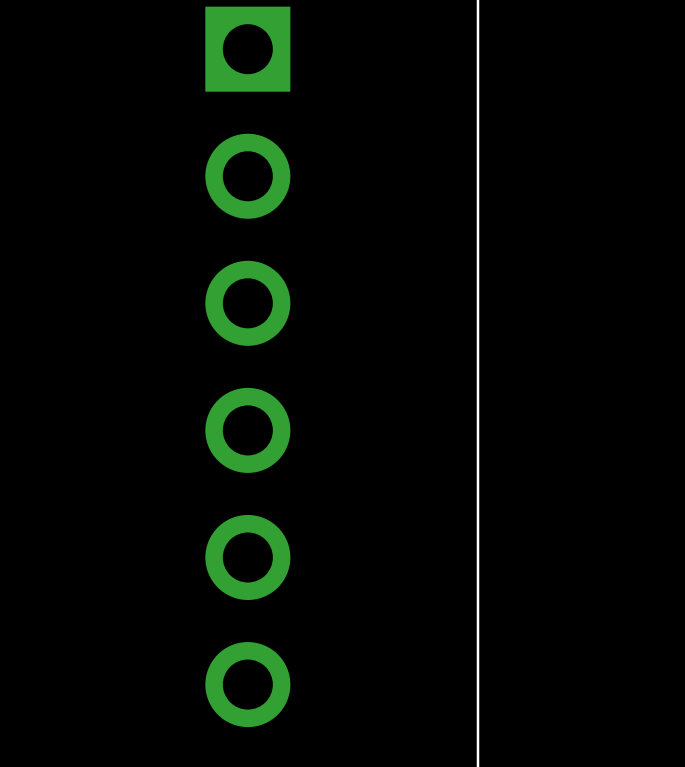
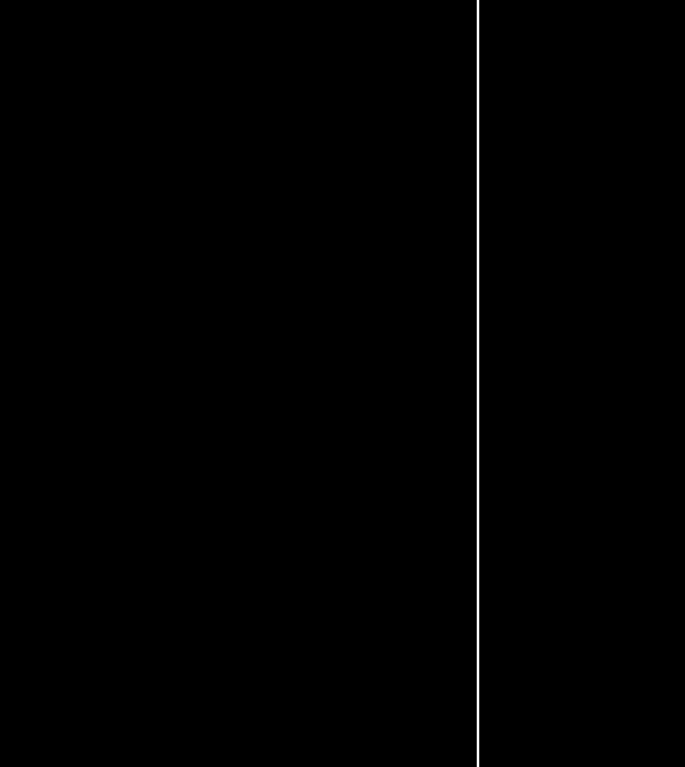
part: (247, 366) -> none

